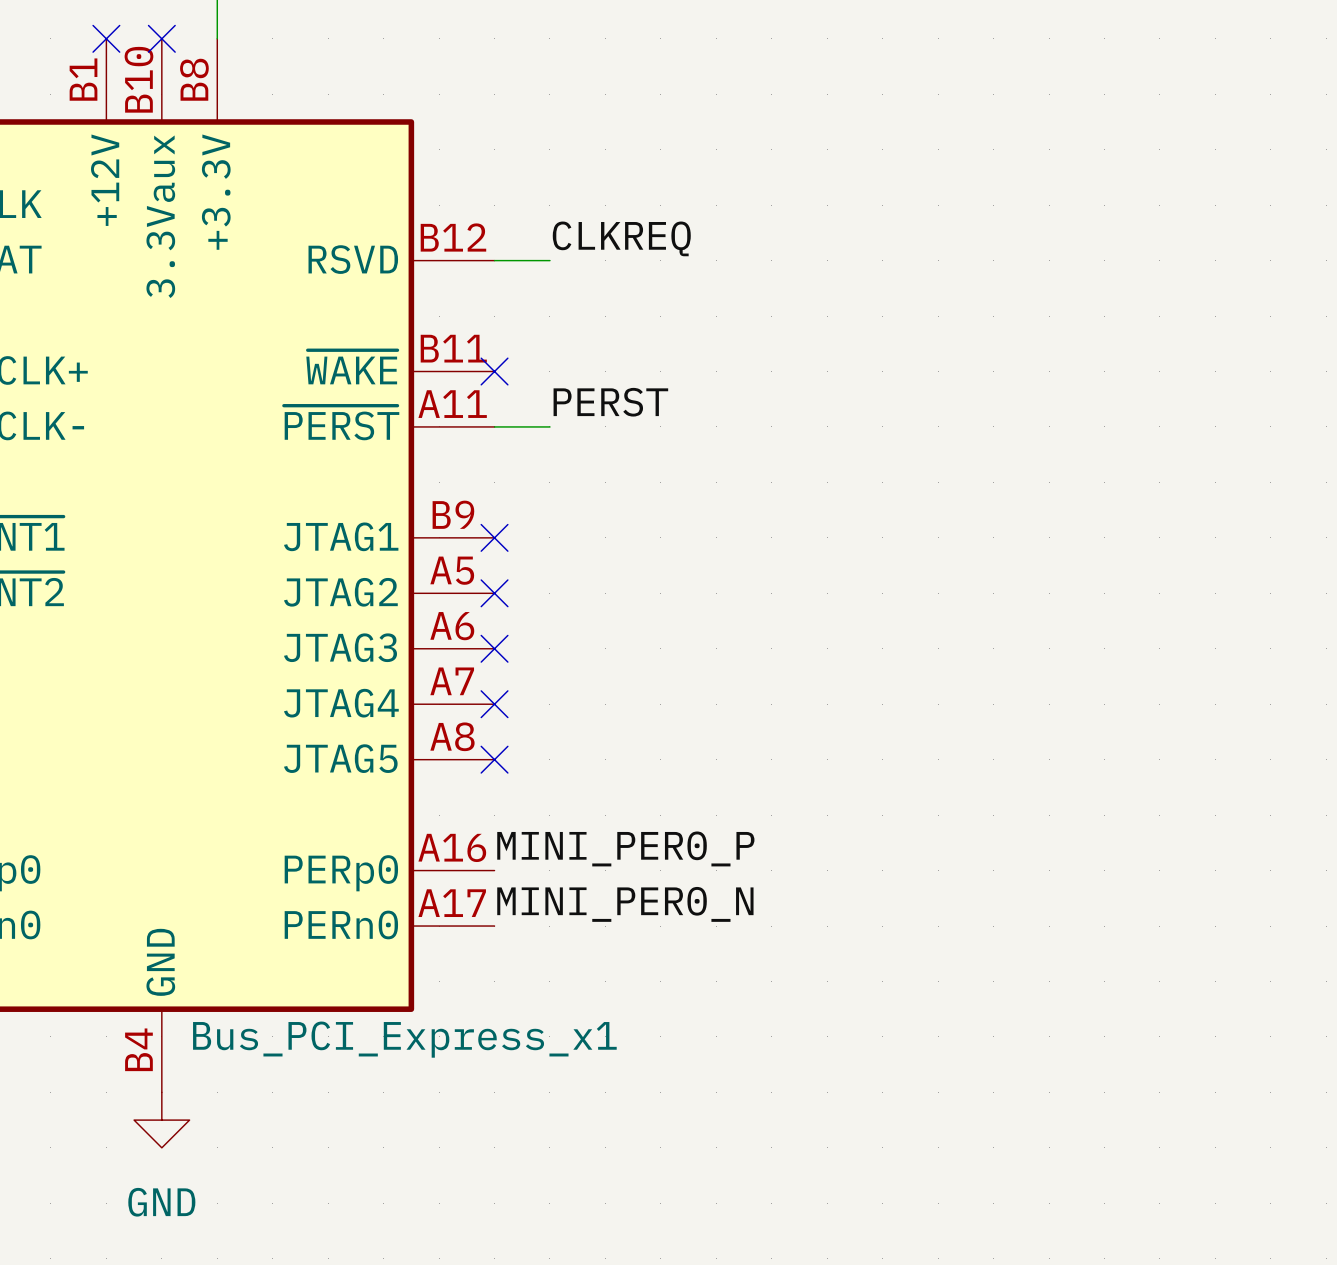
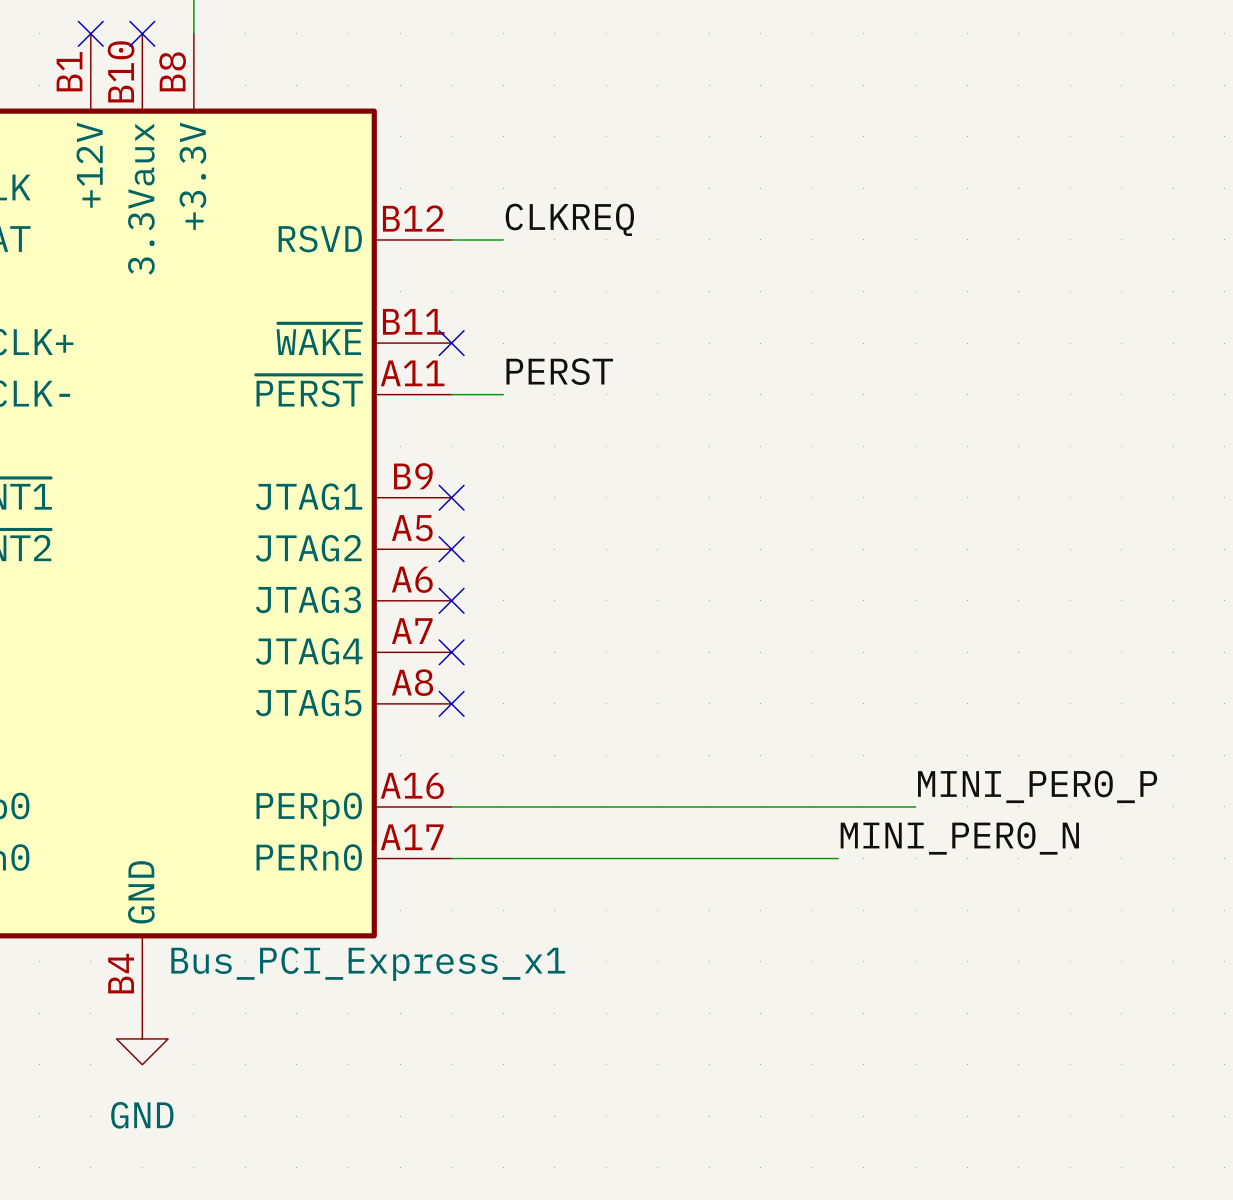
label position: MINI_PER0_P (625, 848) -> MINI_PER0_P (1037, 786)
wire: none -> (451, 806) (915, 806)
label position: MINI_PER0_N (625, 904) -> MINI_PER0_N (959, 838)
wire: none -> (451, 858) (838, 858)

